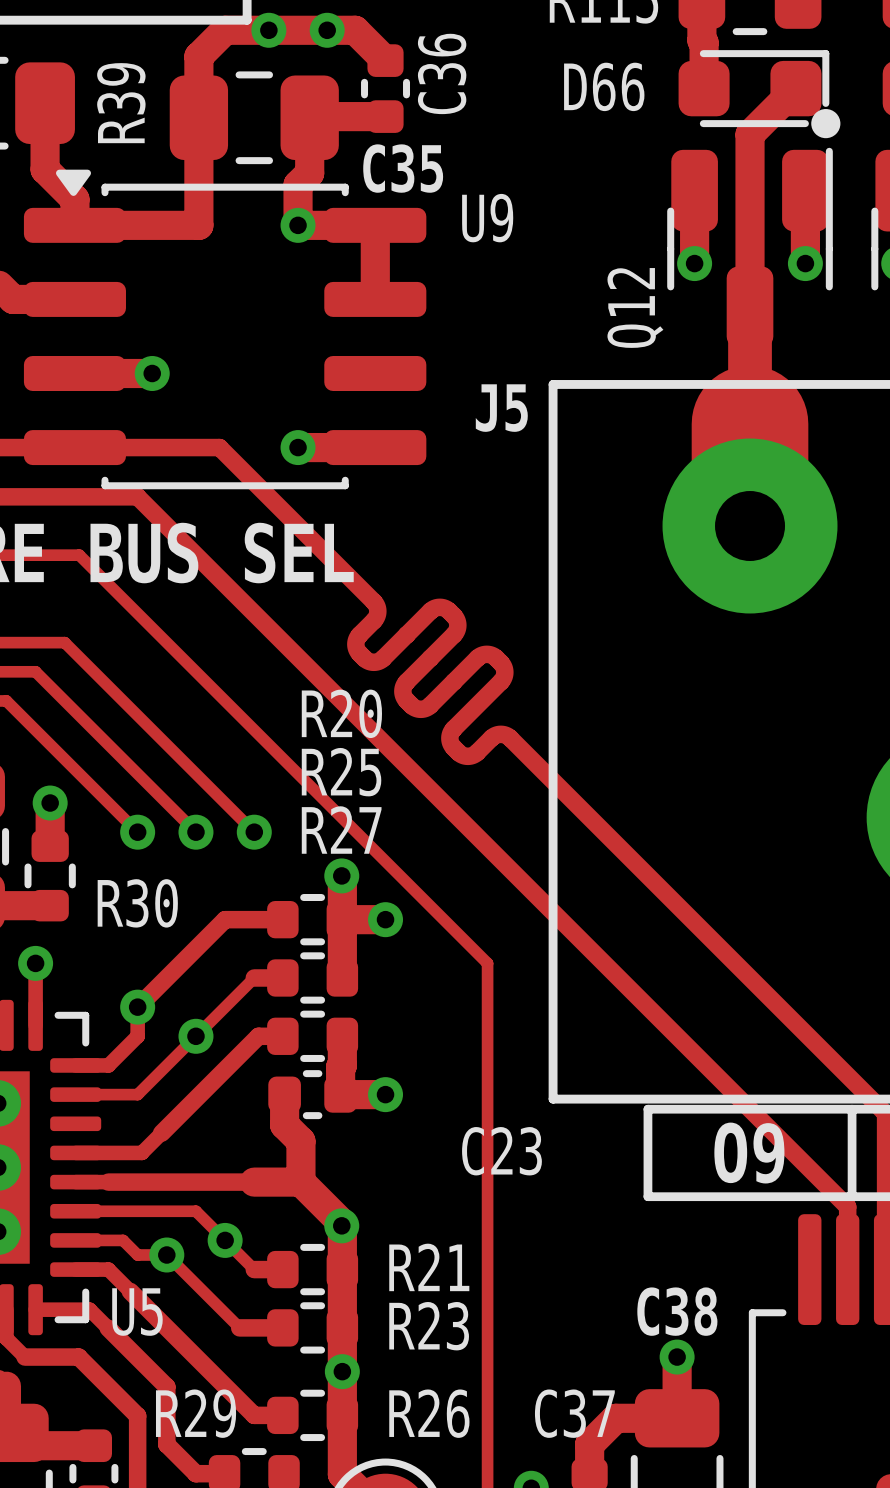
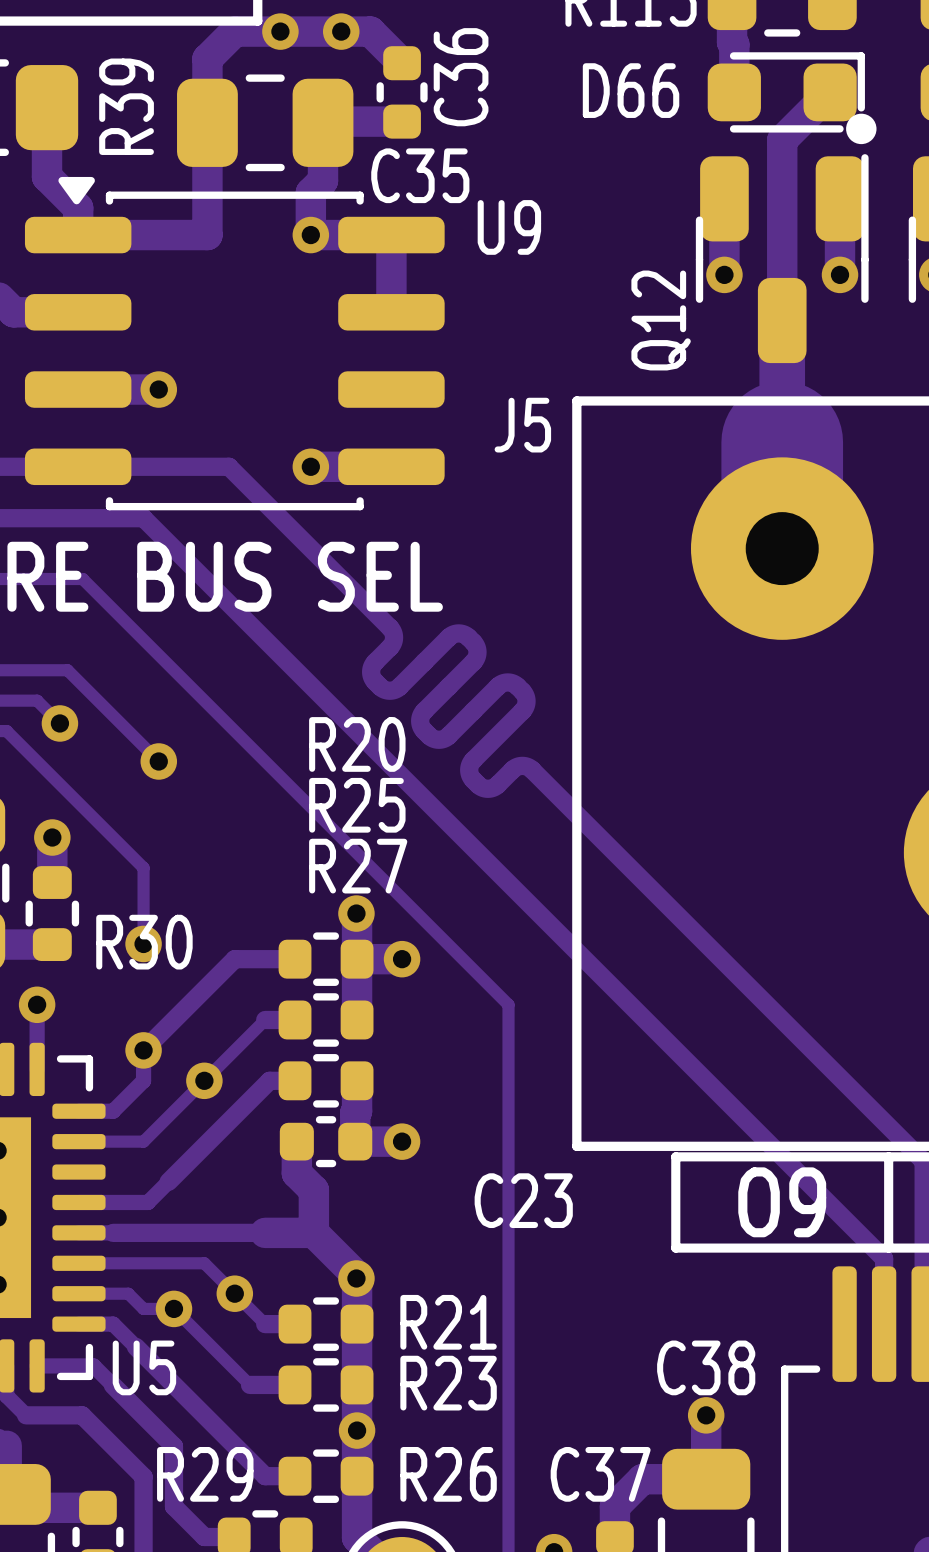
track: (57, 693) (195, 832) -> none
via: none -> (59, 723)
track: (152, 730) (254, 832) -> none
via: none -> (158, 761)
track: none -> (143, 867) (143, 943)
via: (137, 832) -> none
via: (195, 832) -> none
via: (254, 832) -> none
via: none -> (143, 943)

